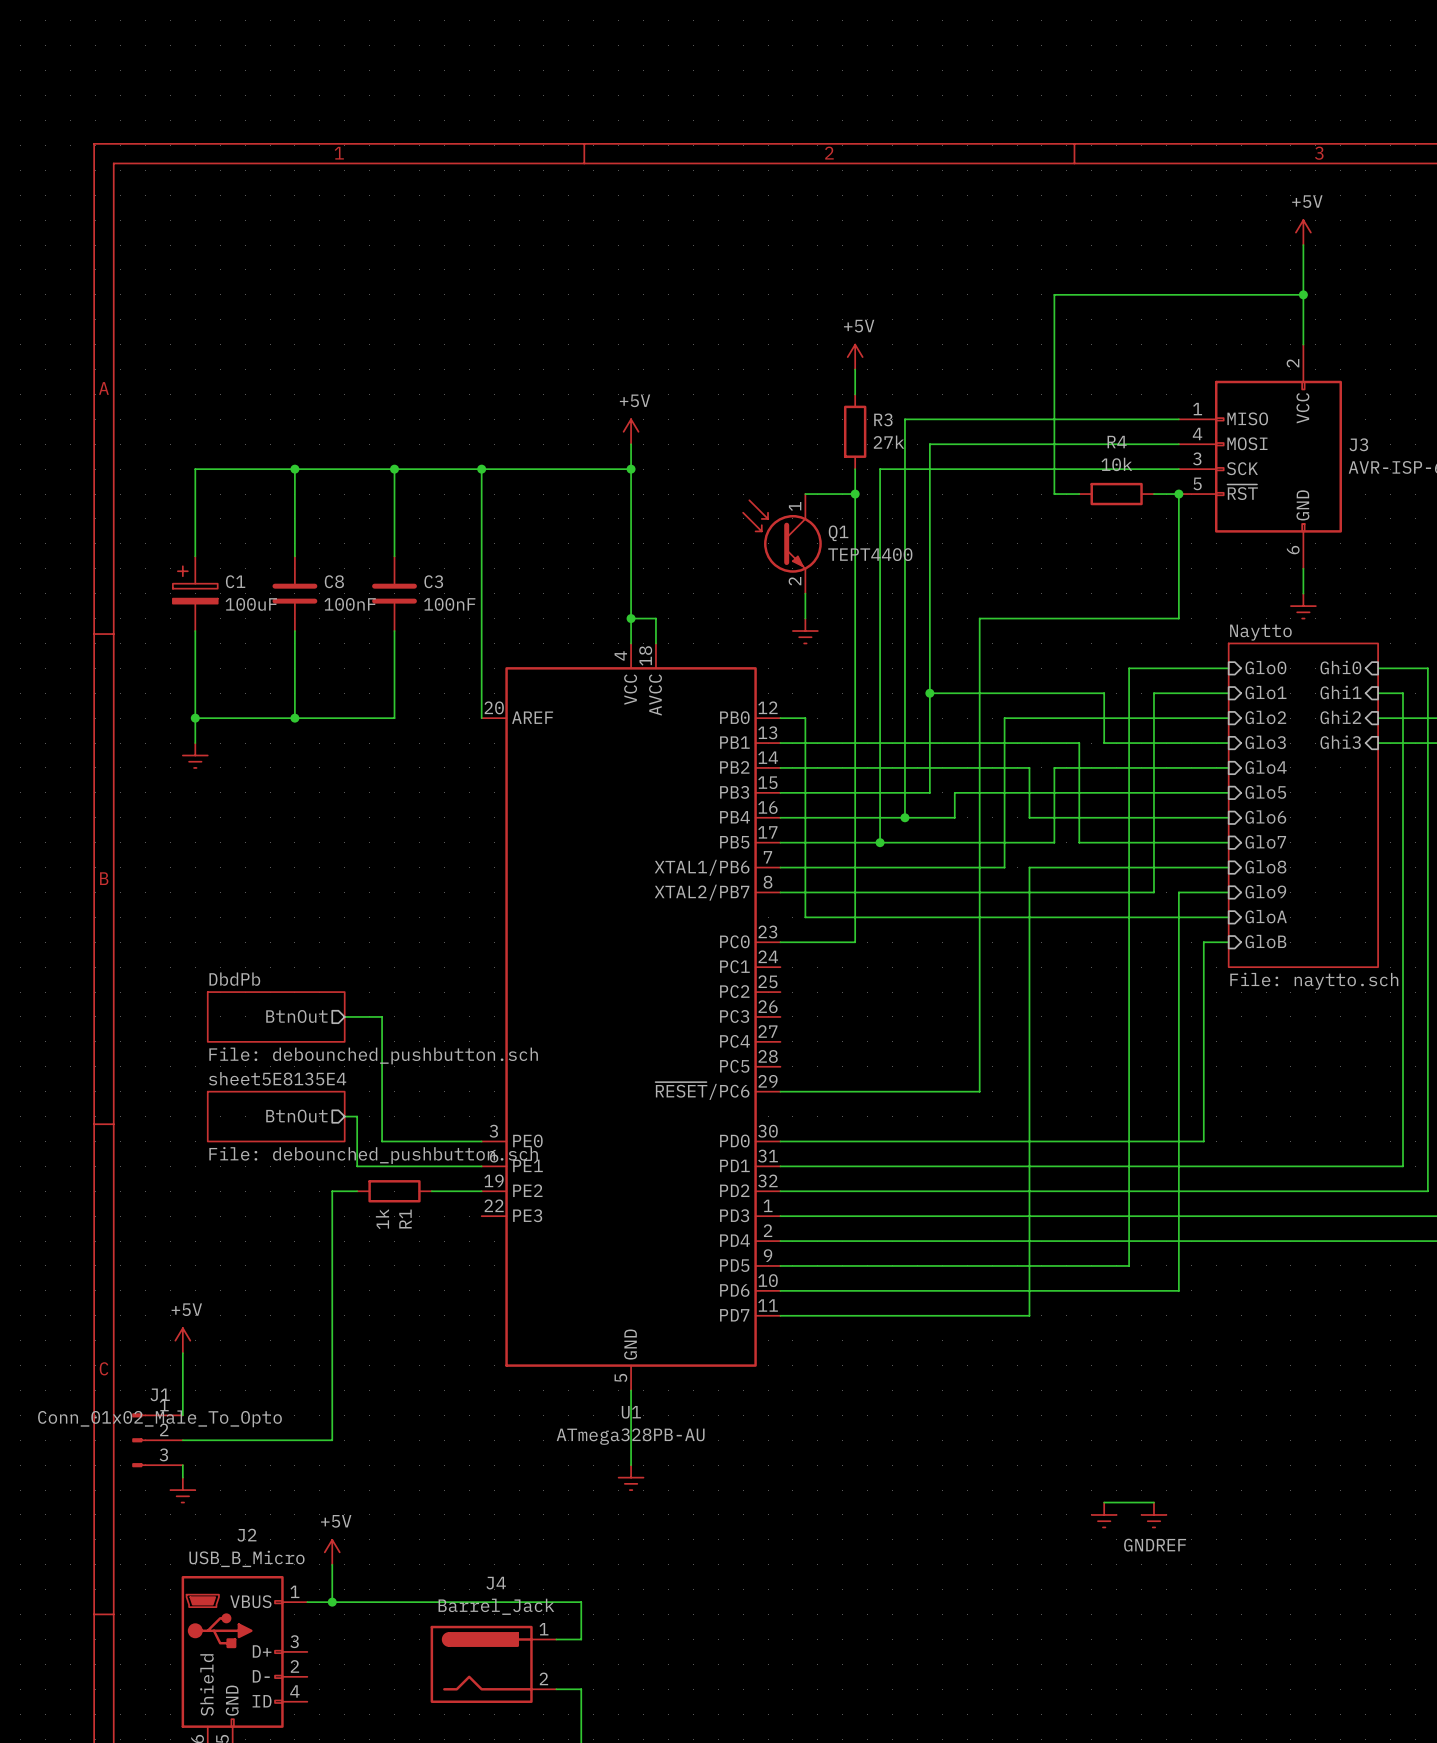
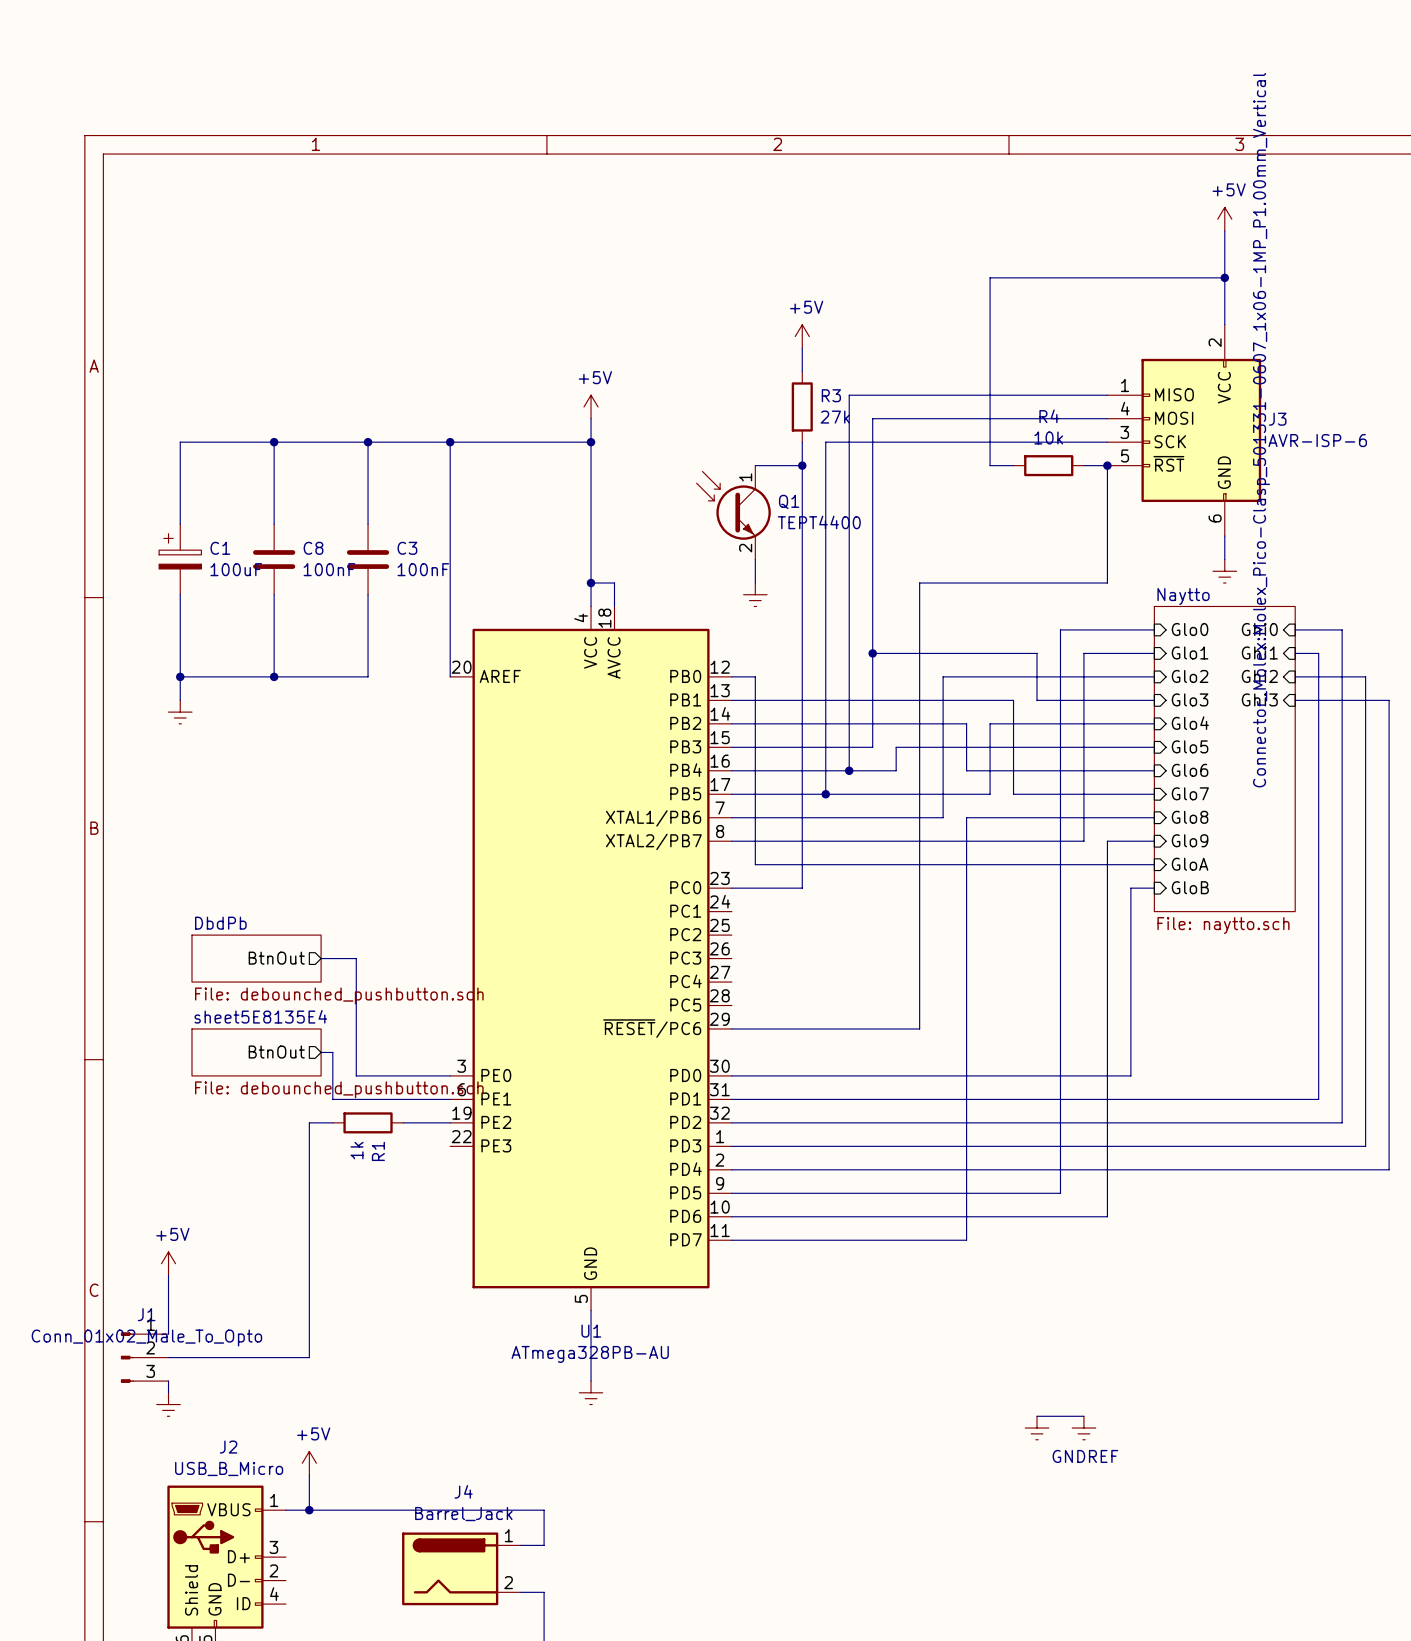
J3 text: none -> Connector_Molex:Molex_Pico-Clasp_501331-0607_1x06-1MP_P1.00mm_Vertical (1261, 430)

